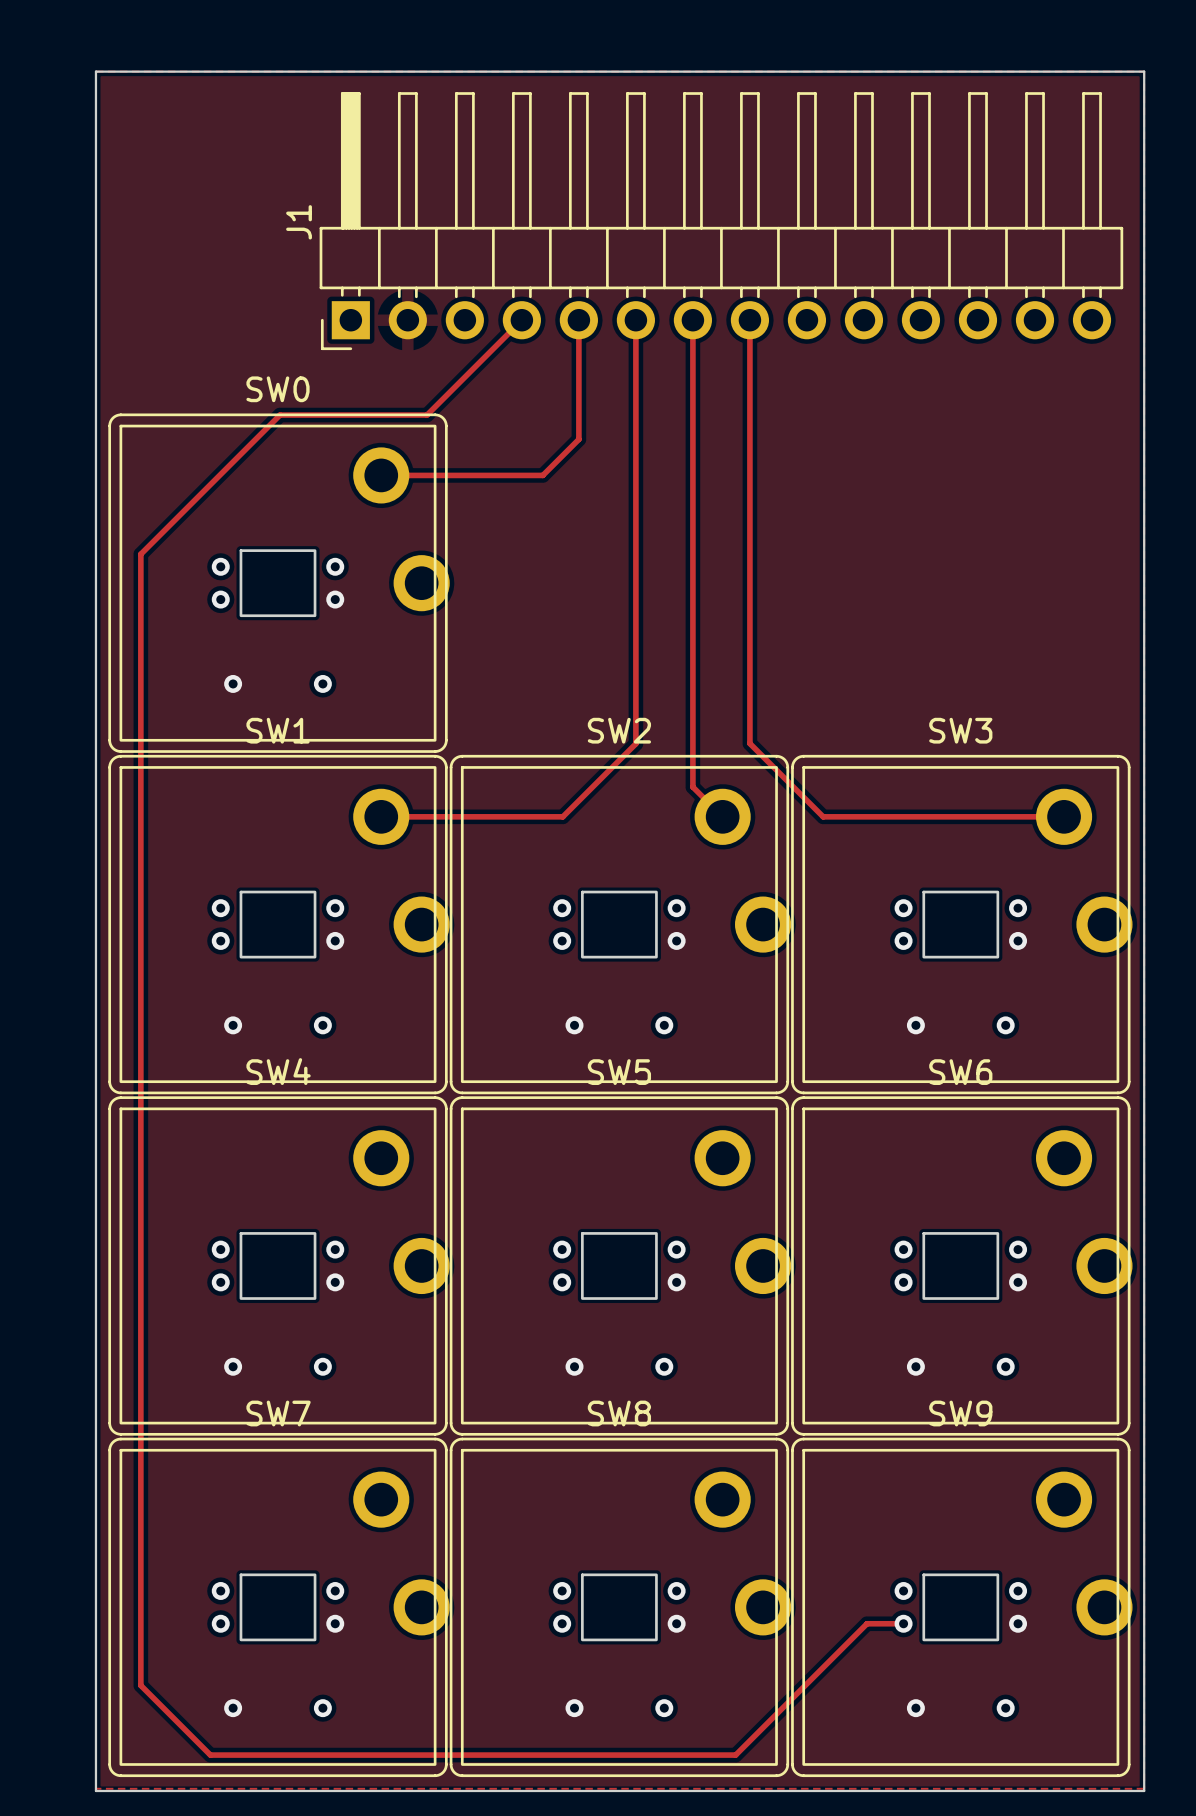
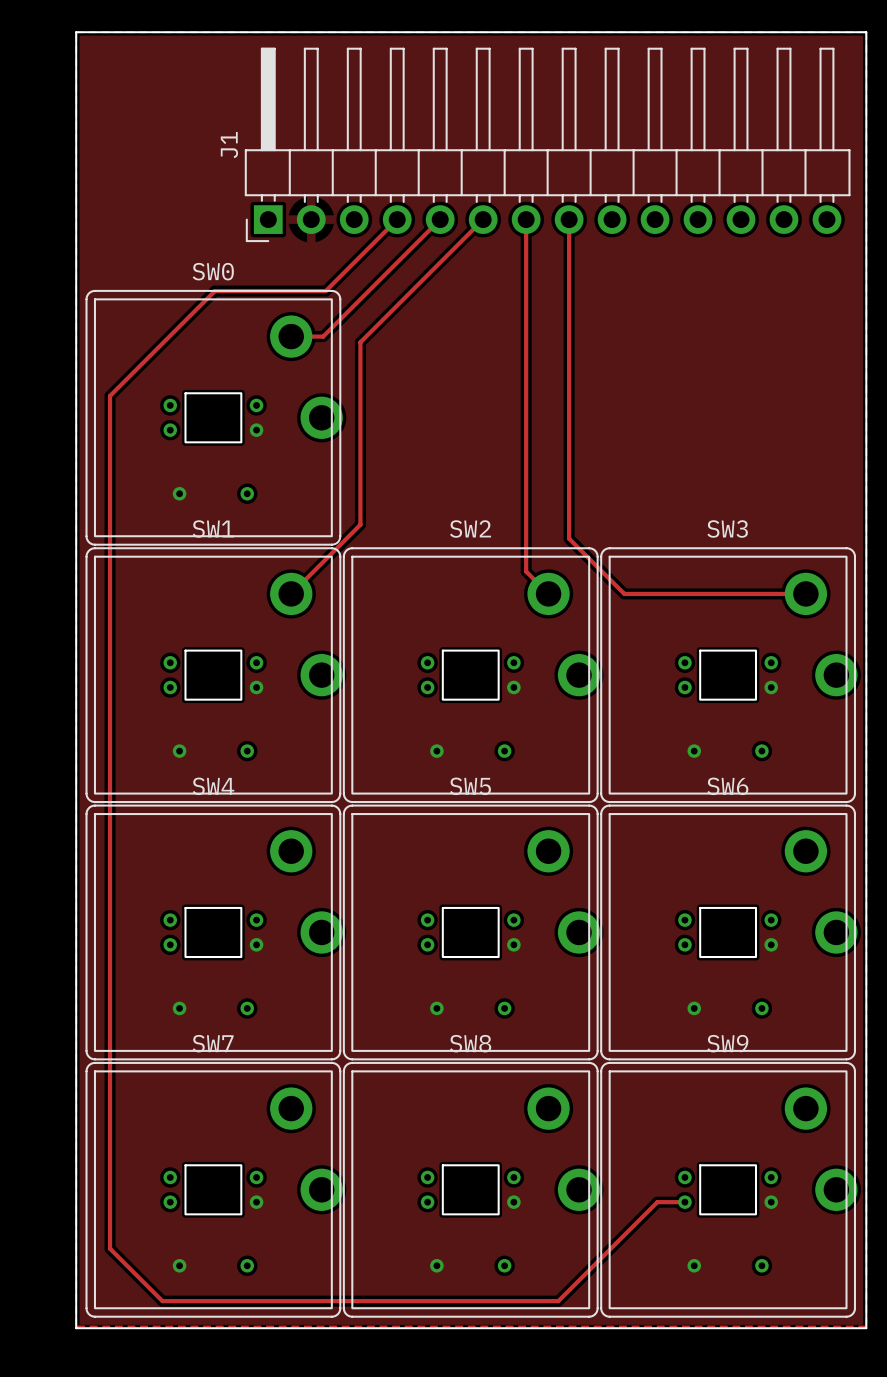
track: (578, 320) (578, 439) (542, 475) (423, 475) -> (440, 219) (323, 336)
track: (635, 320) (635, 743) (562, 816) (381, 816) -> (483, 219) (360, 342) (360, 524) (291, 593)

